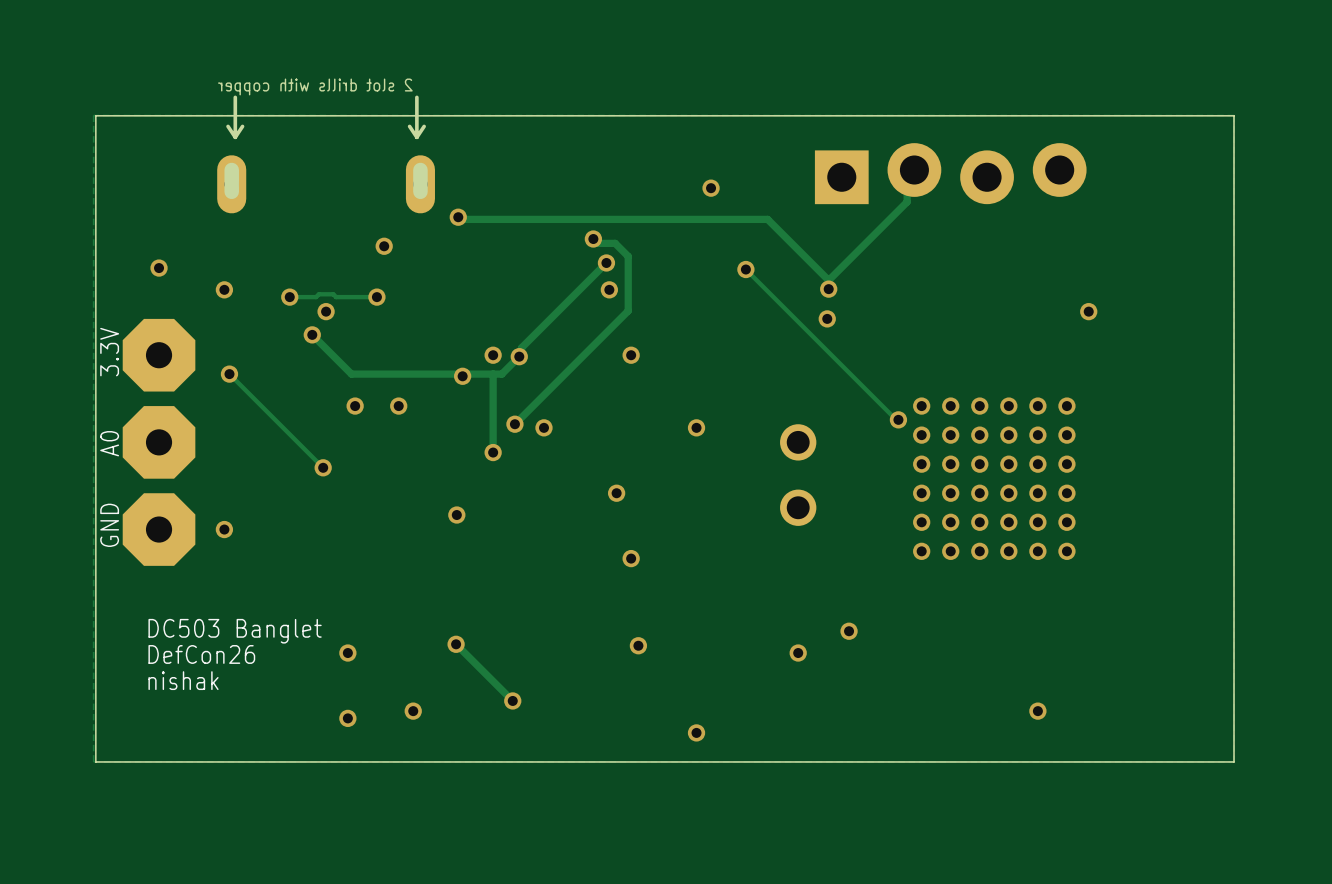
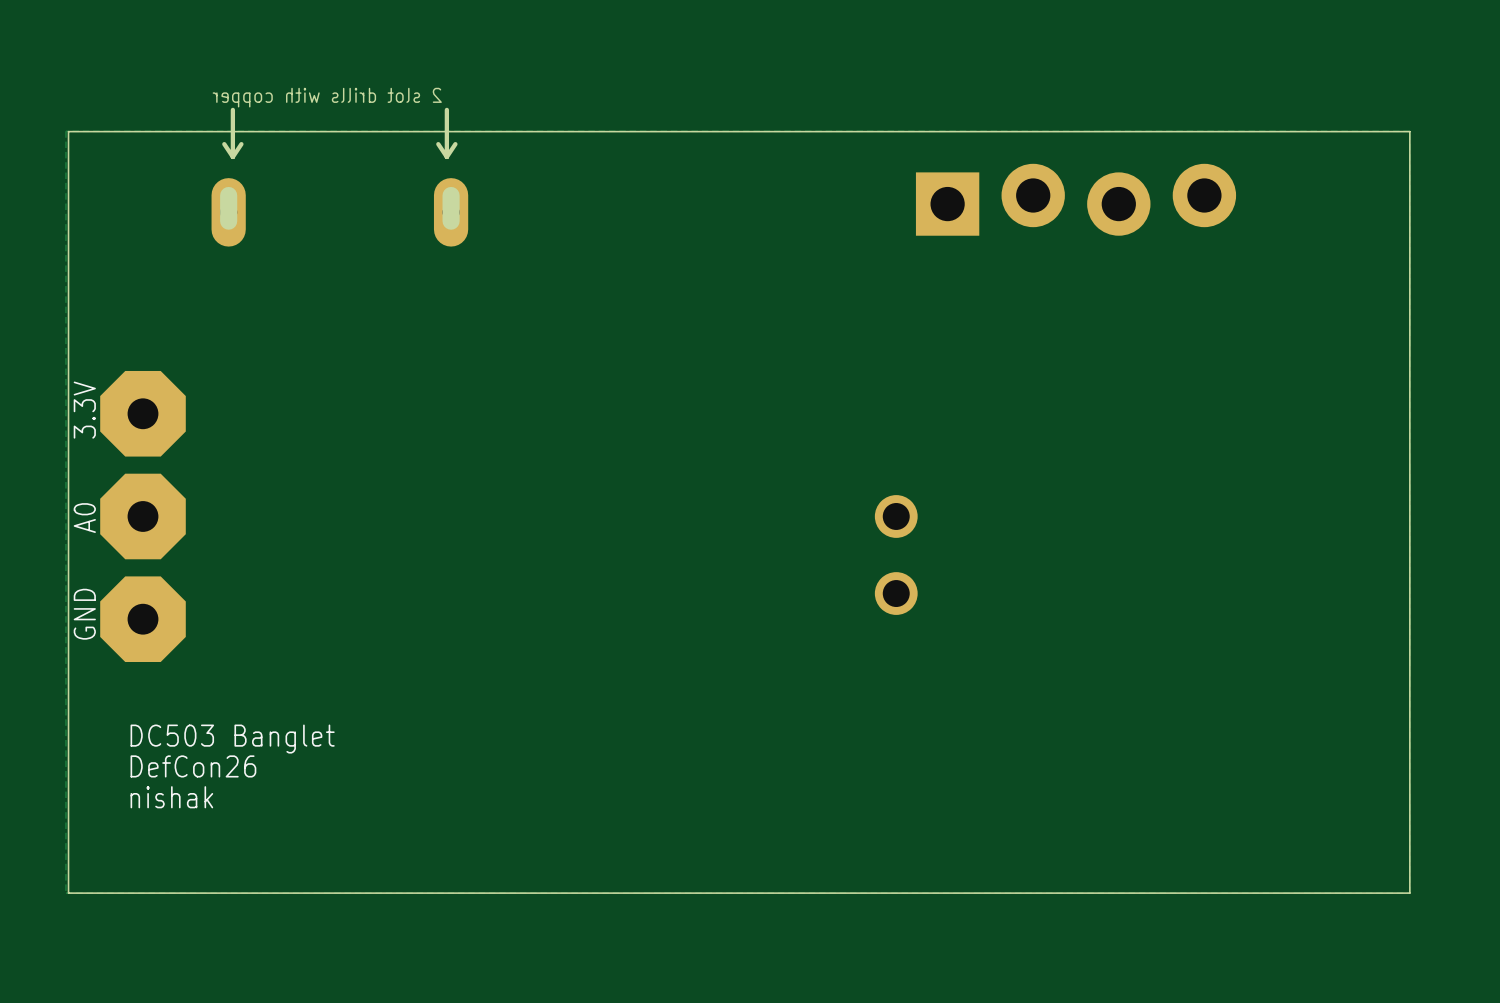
track: (914, 170) (907, 177) (907, 201) (828, 280) -> none
via: (711, 188) -> none
track: (458, 217) (460, 219) (767, 219) (828, 280) -> none
via: (458, 217) -> none
track: (593, 239) (597, 243) (615, 243) (628, 256) (628, 310) (514, 424) -> none
via: (593, 239) -> none
via: (384, 246) -> none
track: (606, 262) (521, 347) (521, 354) (501, 374) (464, 374) (462, 376) (460, 374) (351, 374) (312, 334) -> none
via: (606, 262) -> none
via: (159, 268) -> none
track: (745, 269) (896, 419) (898, 419) -> none
via: (745, 269) -> none
via: (224, 289) -> none
via: (609, 289) -> none
via: (828, 289) -> none
via: (289, 297) -> none
track: (376, 297) (336, 297) (333, 294) (318, 294) (316, 297) (289, 297) -> none
via: (376, 297) -> none
via: (326, 311) -> none
via: (1088, 311) -> none
via: (827, 318) -> none
via: (312, 334) -> none
via: (493, 355) -> none
via: (631, 355) -> none
via: (519, 356) -> none
track: (229, 374) (323, 467) -> none
via: (229, 374) -> none
track: (493, 374) (493, 452) -> none
via: (462, 376) -> none
via: (355, 406) -> none
via: (398, 406) -> none
via: (921, 406) -> none
via: (950, 406) -> none
via: (979, 406) -> none
via: (1008, 406) -> none
via: (1037, 406) -> none
via: (1066, 406) -> none
via: (898, 419) -> none
via: (514, 424) -> none
via: (543, 427) -> none
via: (696, 427) -> none
via: (921, 435) -> none
via: (950, 435) -> none
via: (979, 435) -> none
via: (1008, 435) -> none
via: (1037, 435) -> none
via: (1066, 435) -> none
via: (493, 452) -> none
via: (921, 464) -> none
via: (950, 464) -> none
via: (979, 464) -> none
via: (1008, 464) -> none
via: (1037, 464) -> none
via: (1066, 464) -> none
via: (323, 467) -> none
via: (616, 493) -> none
via: (921, 493) -> none
via: (950, 493) -> none
via: (979, 493) -> none
via: (1008, 493) -> none
via: (1037, 493) -> none
via: (1066, 493) -> none
via: (456, 515) -> none
via: (921, 522) -> none
via: (950, 522) -> none
via: (979, 522) -> none
via: (1008, 522) -> none
via: (1037, 522) -> none
via: (1066, 522) -> none
via: (224, 529) -> none
via: (921, 551) -> none
via: (950, 551) -> none
via: (979, 551) -> none
via: (1008, 551) -> none
via: (1037, 551) -> none
via: (1066, 551) -> none
via: (631, 558) -> none
via: (849, 631) -> none
track: (456, 644) (512, 700) -> none
via: (456, 644) -> none
via: (638, 645) -> none
via: (347, 653) -> none
via: (798, 653) -> none
via: (512, 700) -> none
via: (413, 711) -> none
via: (1037, 711) -> none
via: (347, 718) -> none
via: (696, 732) -> none

